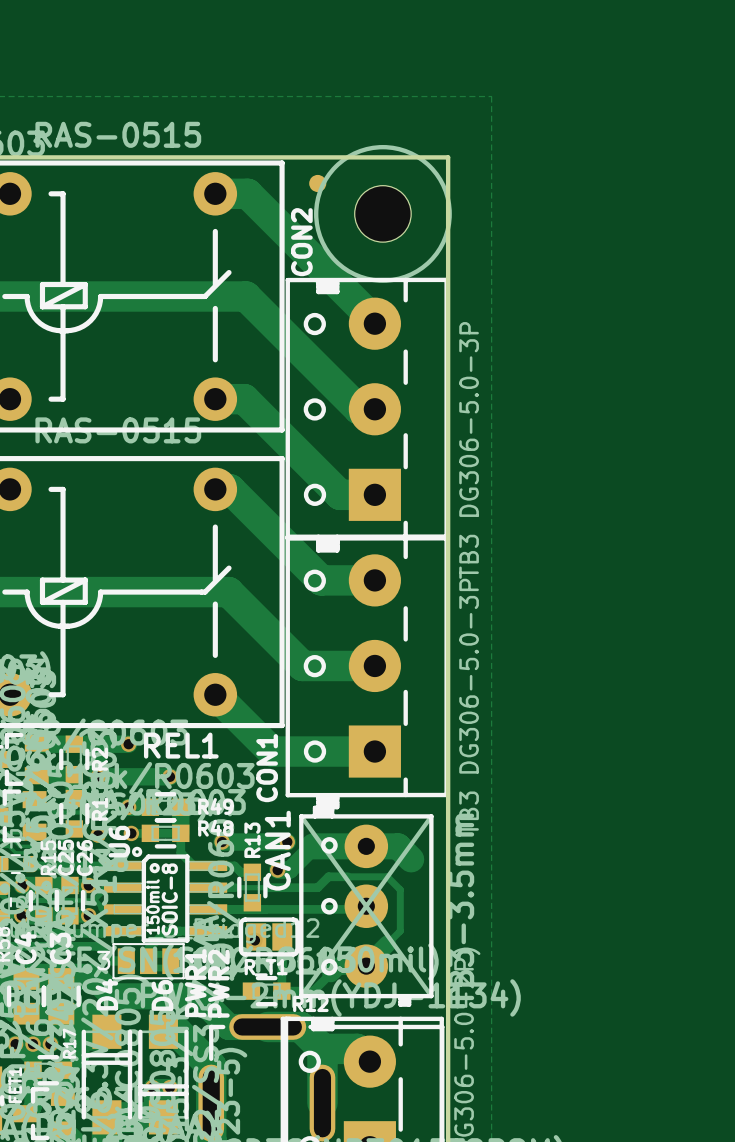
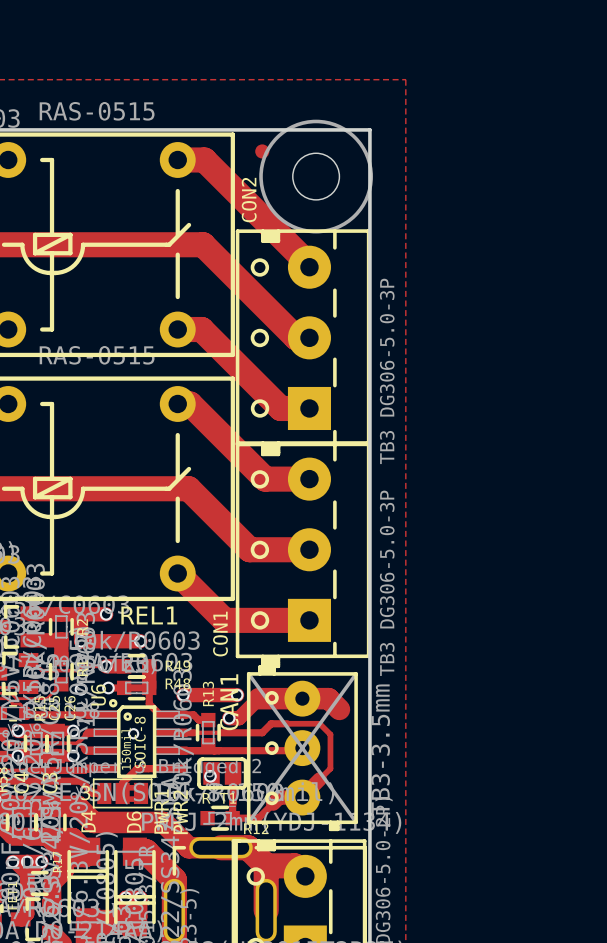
via: none -> (133, 733)

